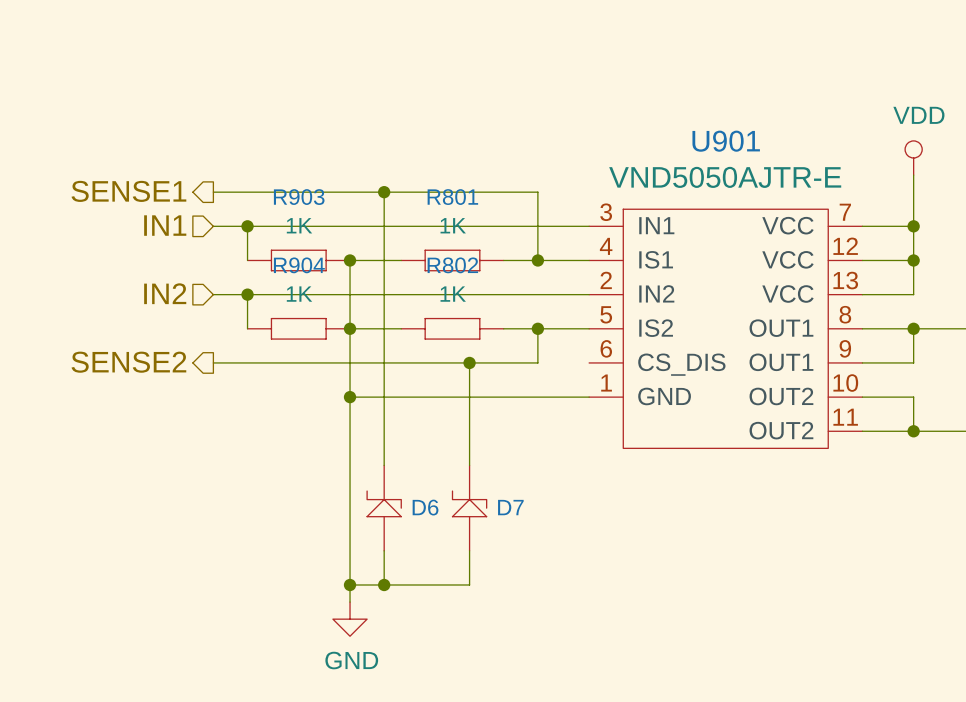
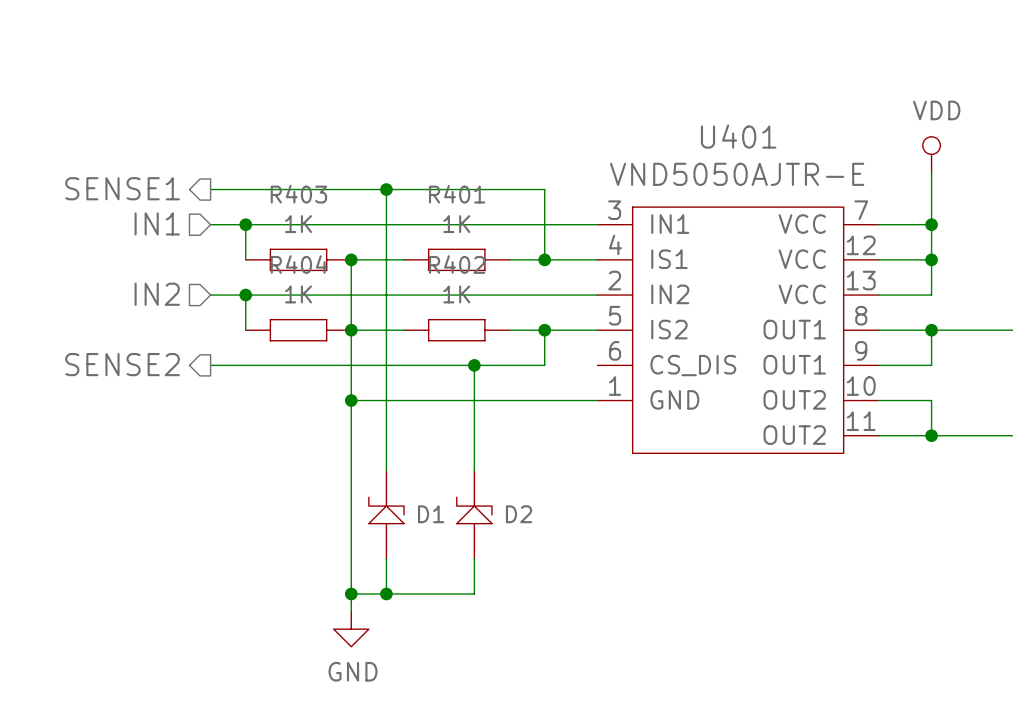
U901 name: U901 (726, 141) -> U401 (738, 136)
R903 name: R903 (299, 197) -> R403 (298, 194)
R801 name: R801 (452, 197) -> R401 (457, 194)
R904 name: R904 (299, 265) -> R404 (299, 264)
R802 name: R802 (452, 265) -> R402 (457, 264)
D6 name: D6 (425, 507) -> D1 (431, 514)
D7 name: D7 (510, 507) -> D2 (519, 514)

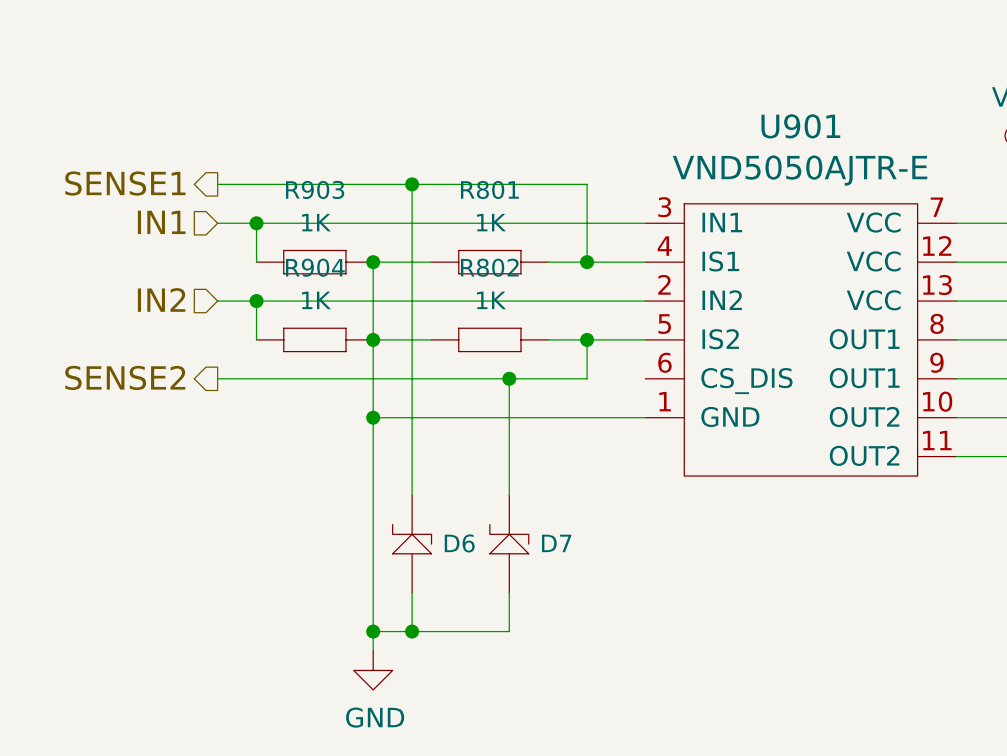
U401 name: U401 (738, 136) -> U901 (800, 126)
R403 name: R403 (298, 194) -> R903 (315, 189)
R401 name: R401 (457, 194) -> R801 (489, 189)
R404 name: R404 (299, 264) -> R904 (315, 267)
R402 name: R402 (457, 264) -> R802 (489, 267)
D1 name: D1 (431, 514) -> D6 (459, 543)
D2 name: D2 (519, 514) -> D7 (556, 543)

